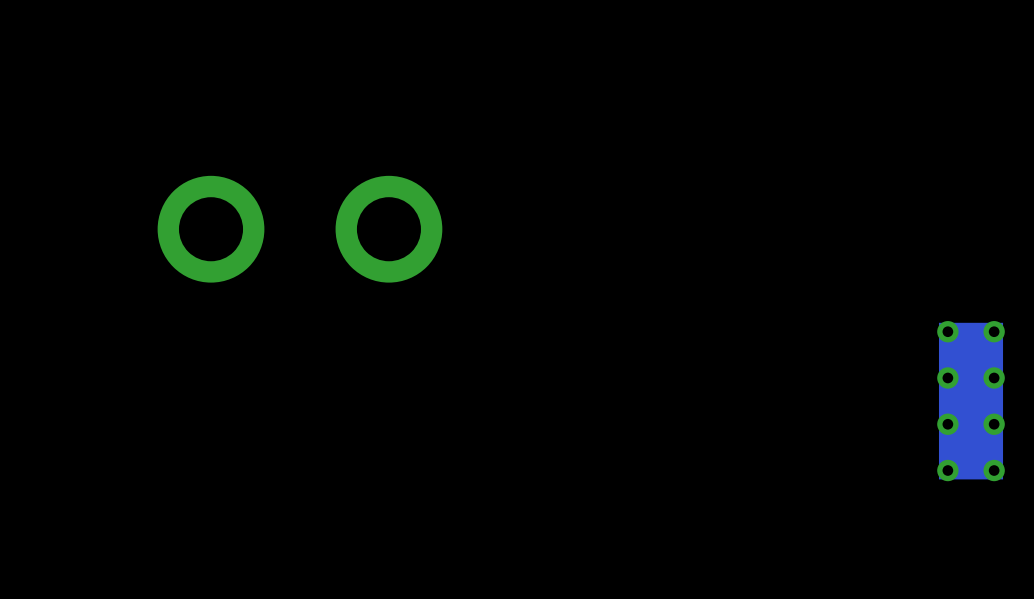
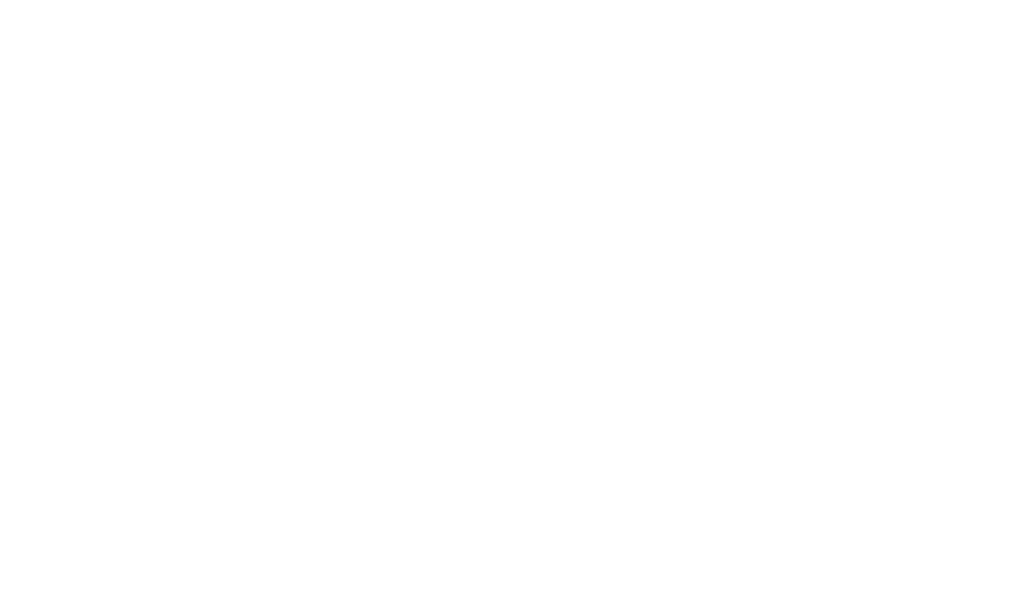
part: (299, 229) -> none
part: (971, 401) -> none

